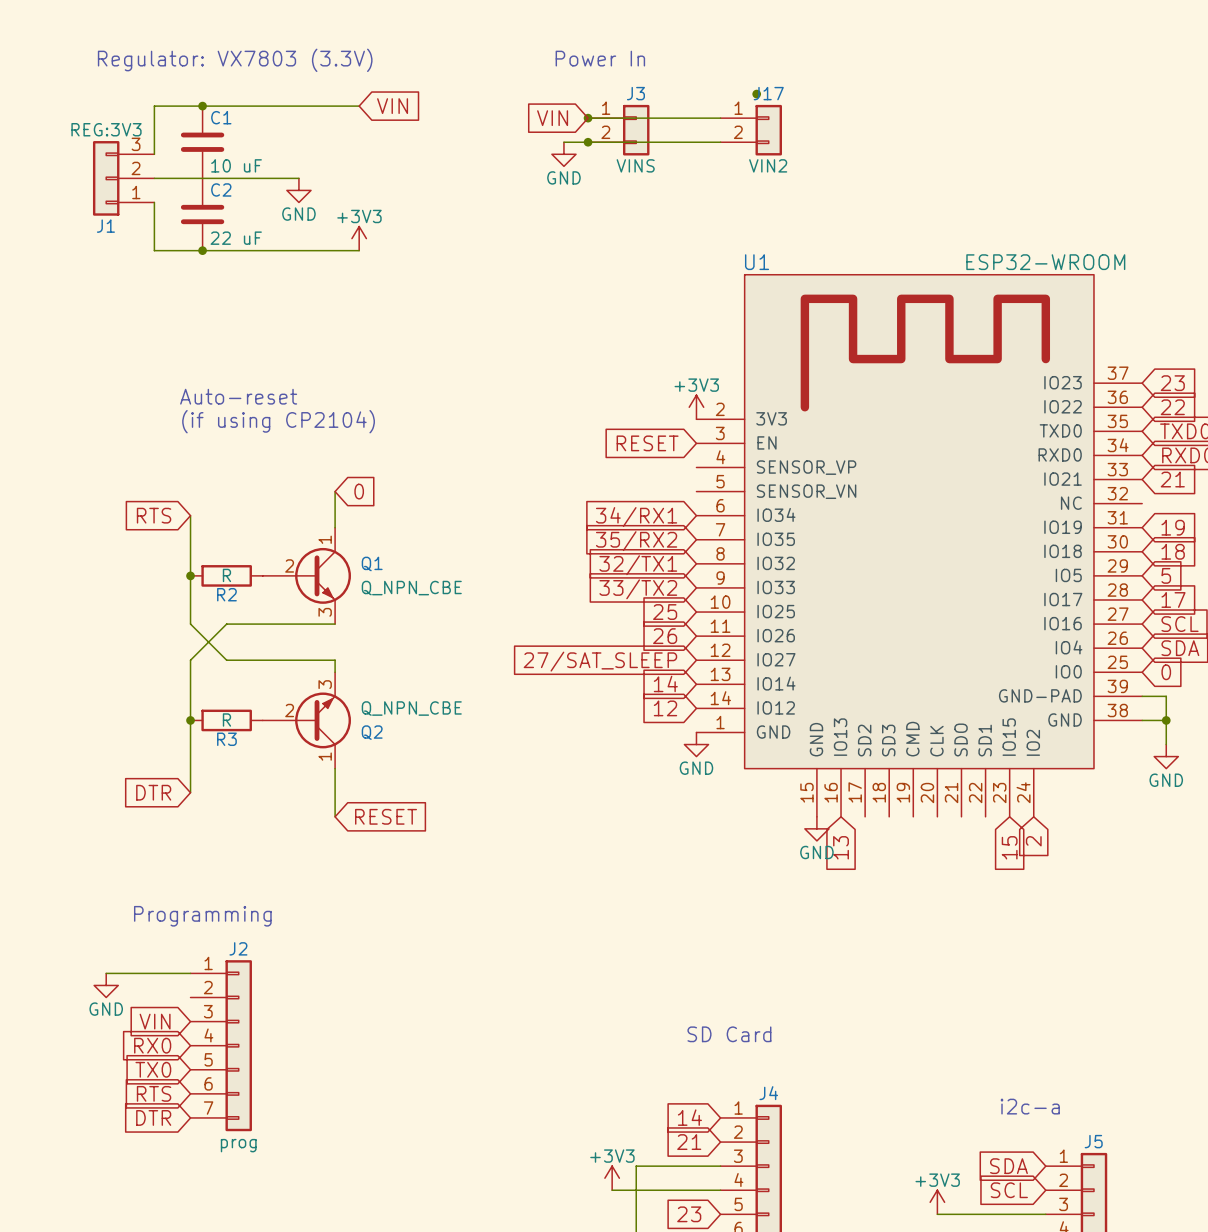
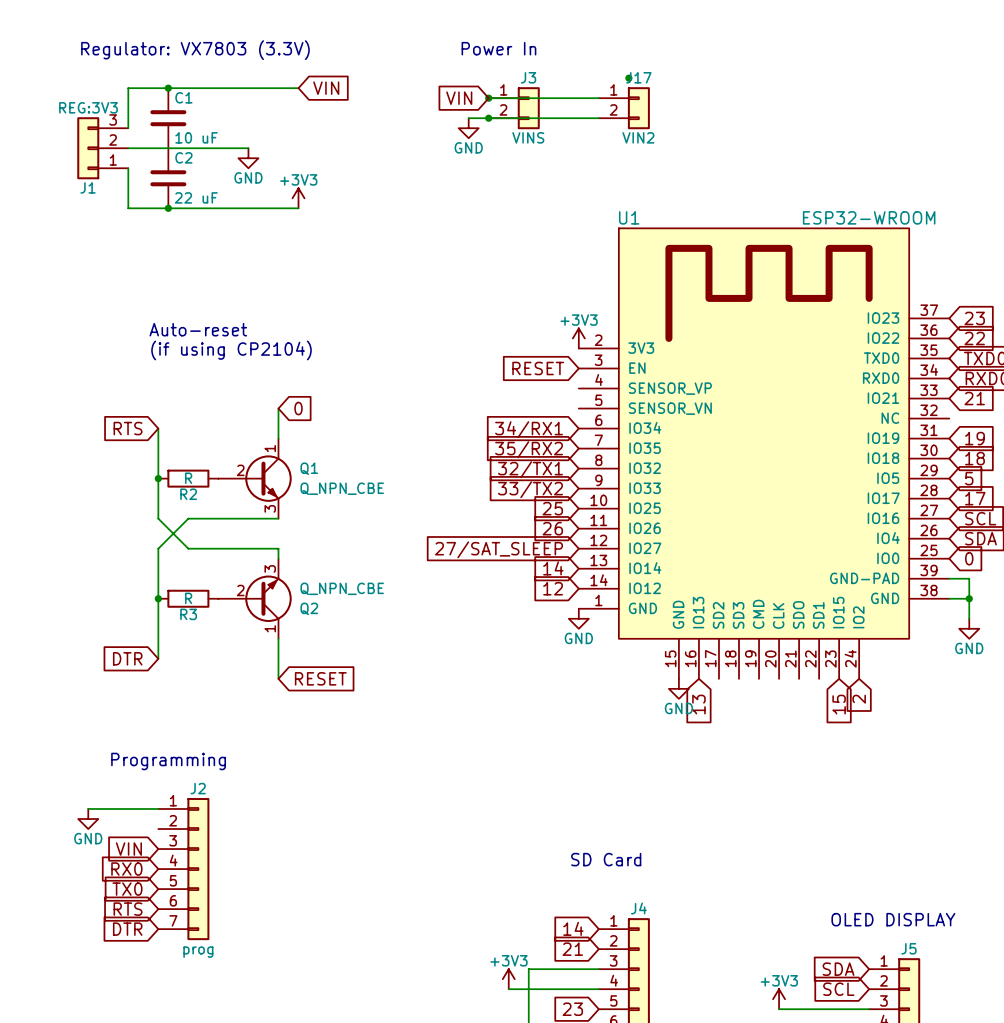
text: i2c-a (1030, 1106) -> OLED DISPLAY (893, 919)

